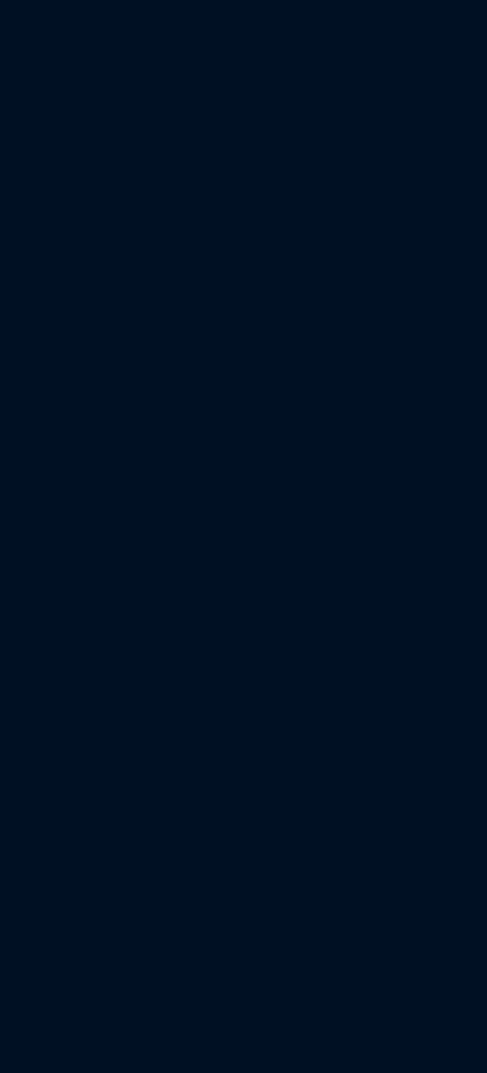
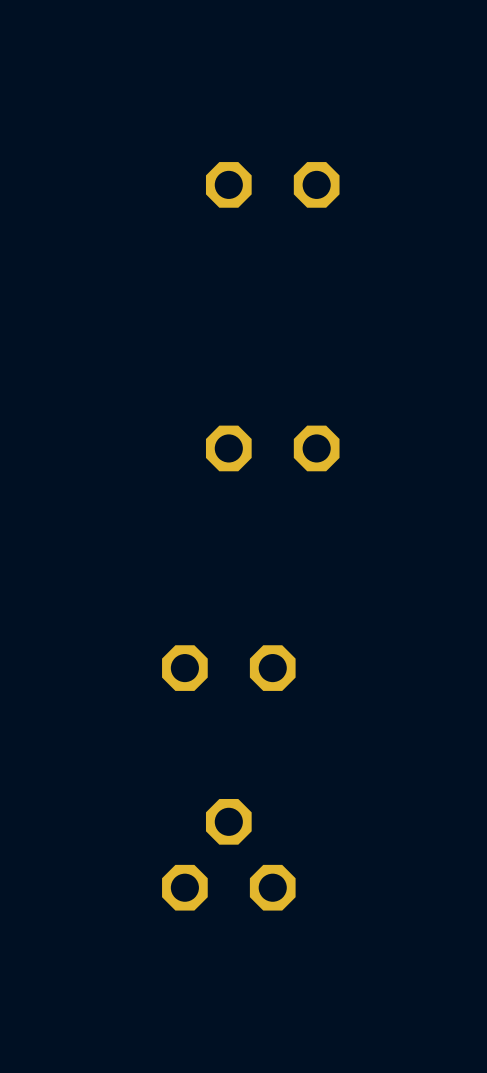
part: none -> (272, 184)
part: none -> (272, 448)
part: none -> (228, 668)
part: none -> (228, 854)

